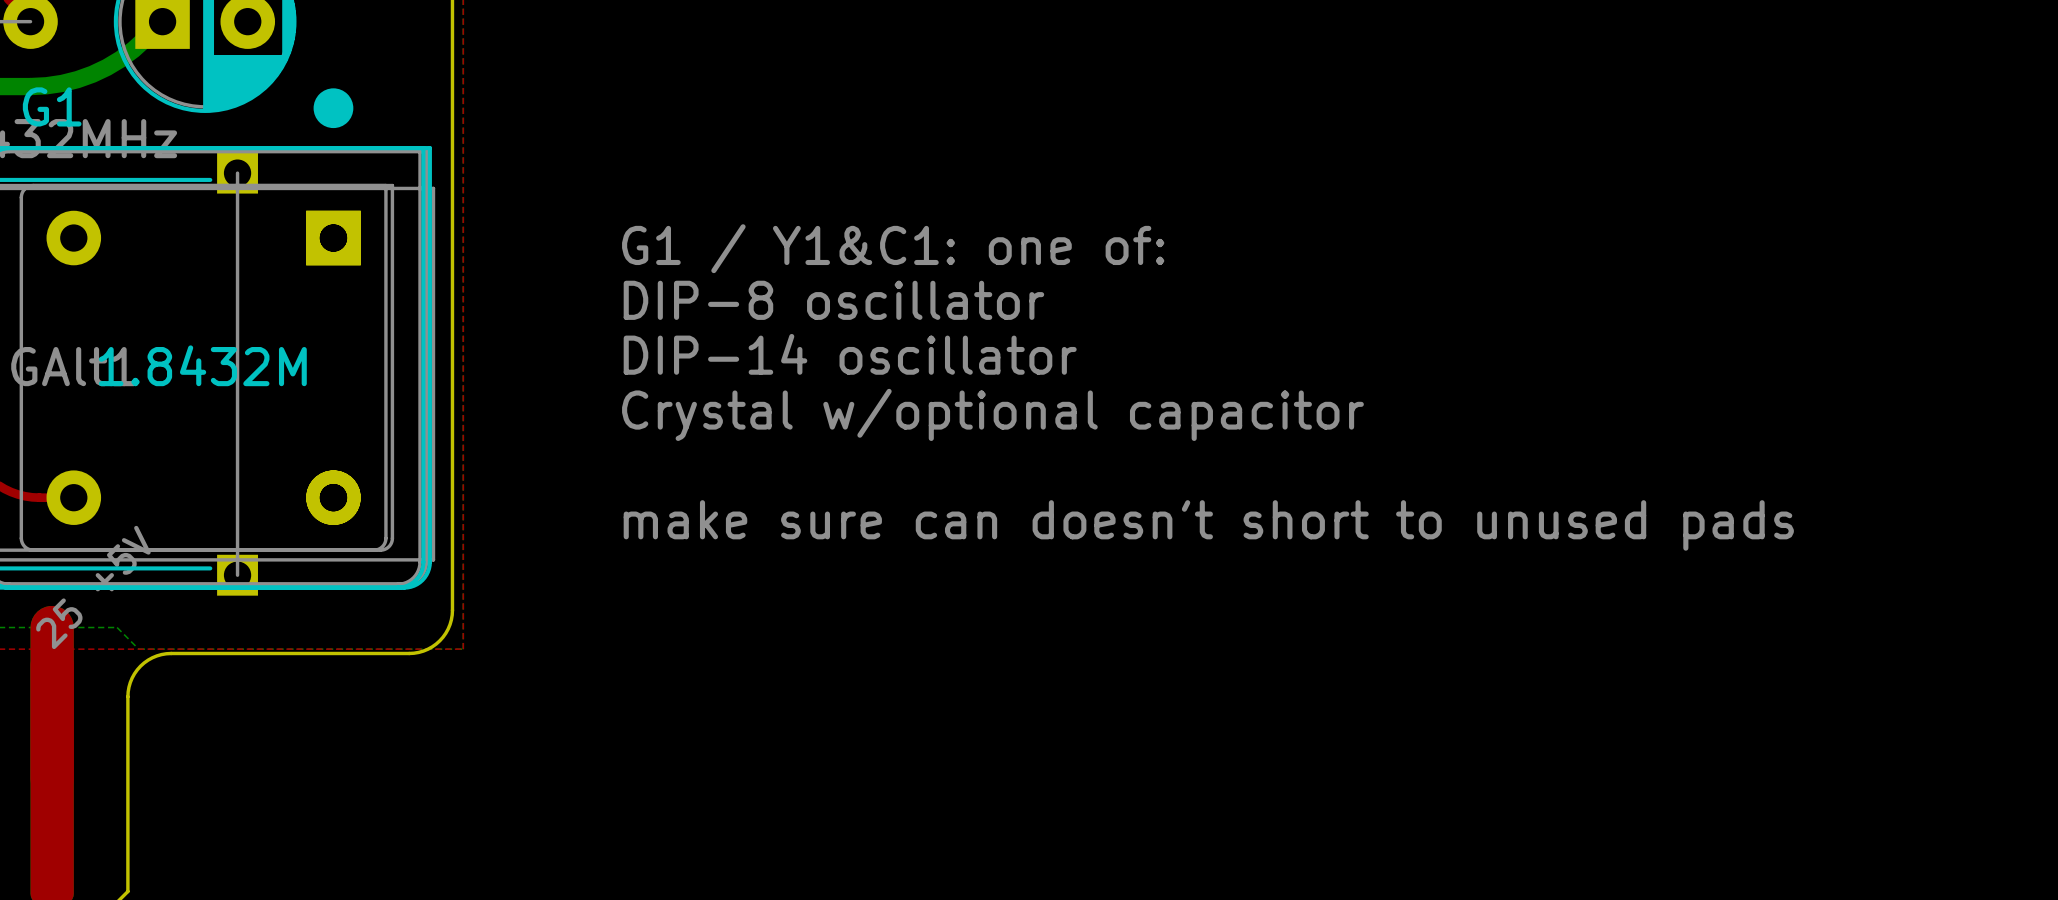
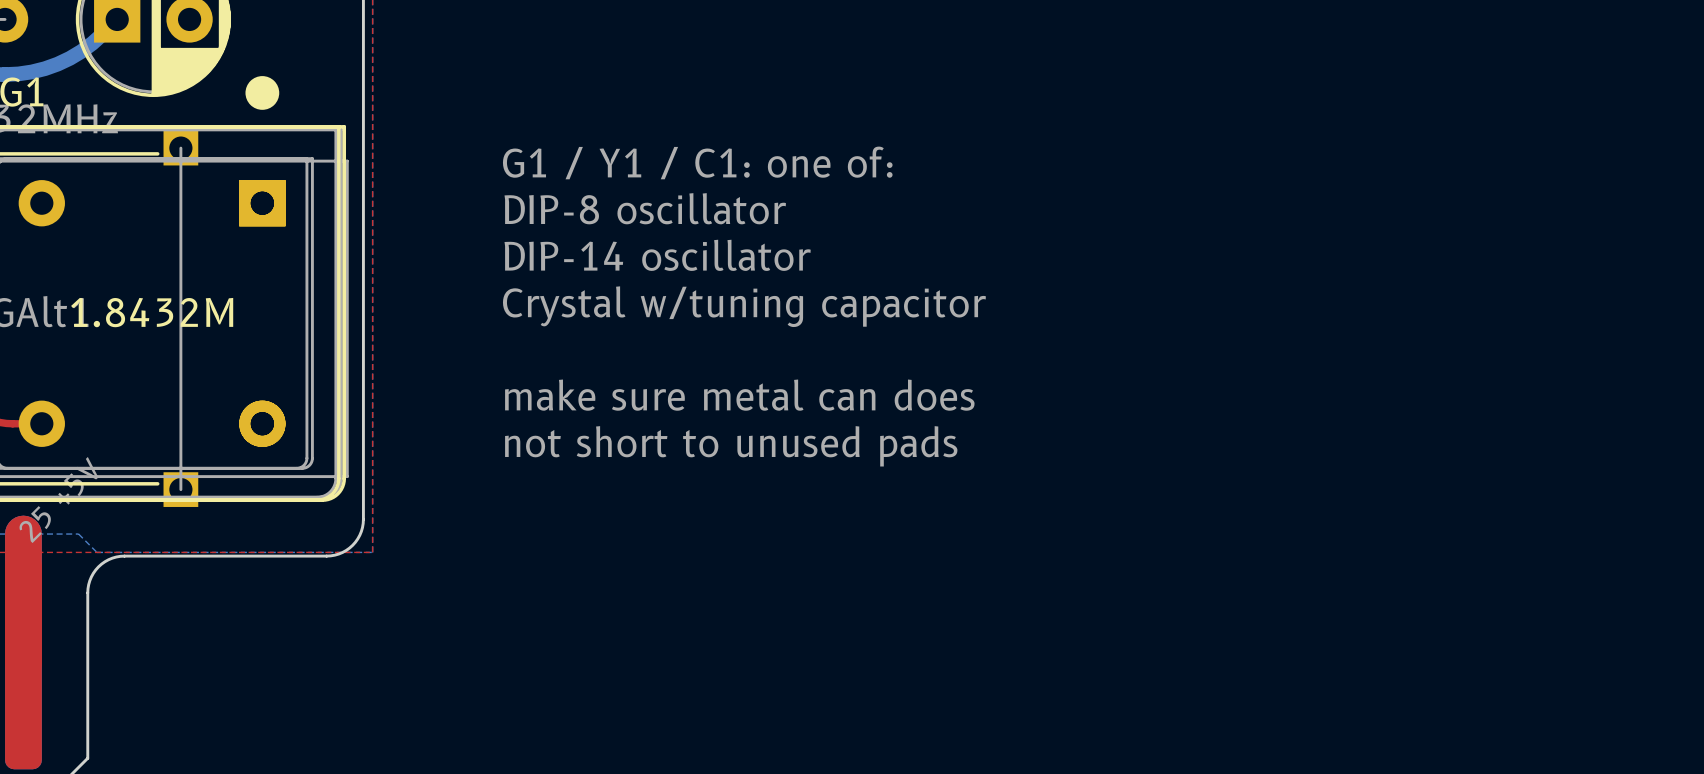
text: none -> G1 / Y1 / C1: one of: (697, 162)
text: G1 / Y1&C1: one of: (893, 248) -> DIP-8 oscillator (645, 208)
text: DIP-8 oscillator (833, 300) -> DIP-14 oscillator (657, 255)
text: DIP-14 oscillator (850, 354) -> Crystal w/tuning capacitor (744, 306)
text: Crystal w/optional capacitor (992, 414) -> none
text: none -> make sure metal can does (739, 395)
text: make sure can doesn't short to unused pads (1208, 525) -> not short to unused pads (731, 446)

